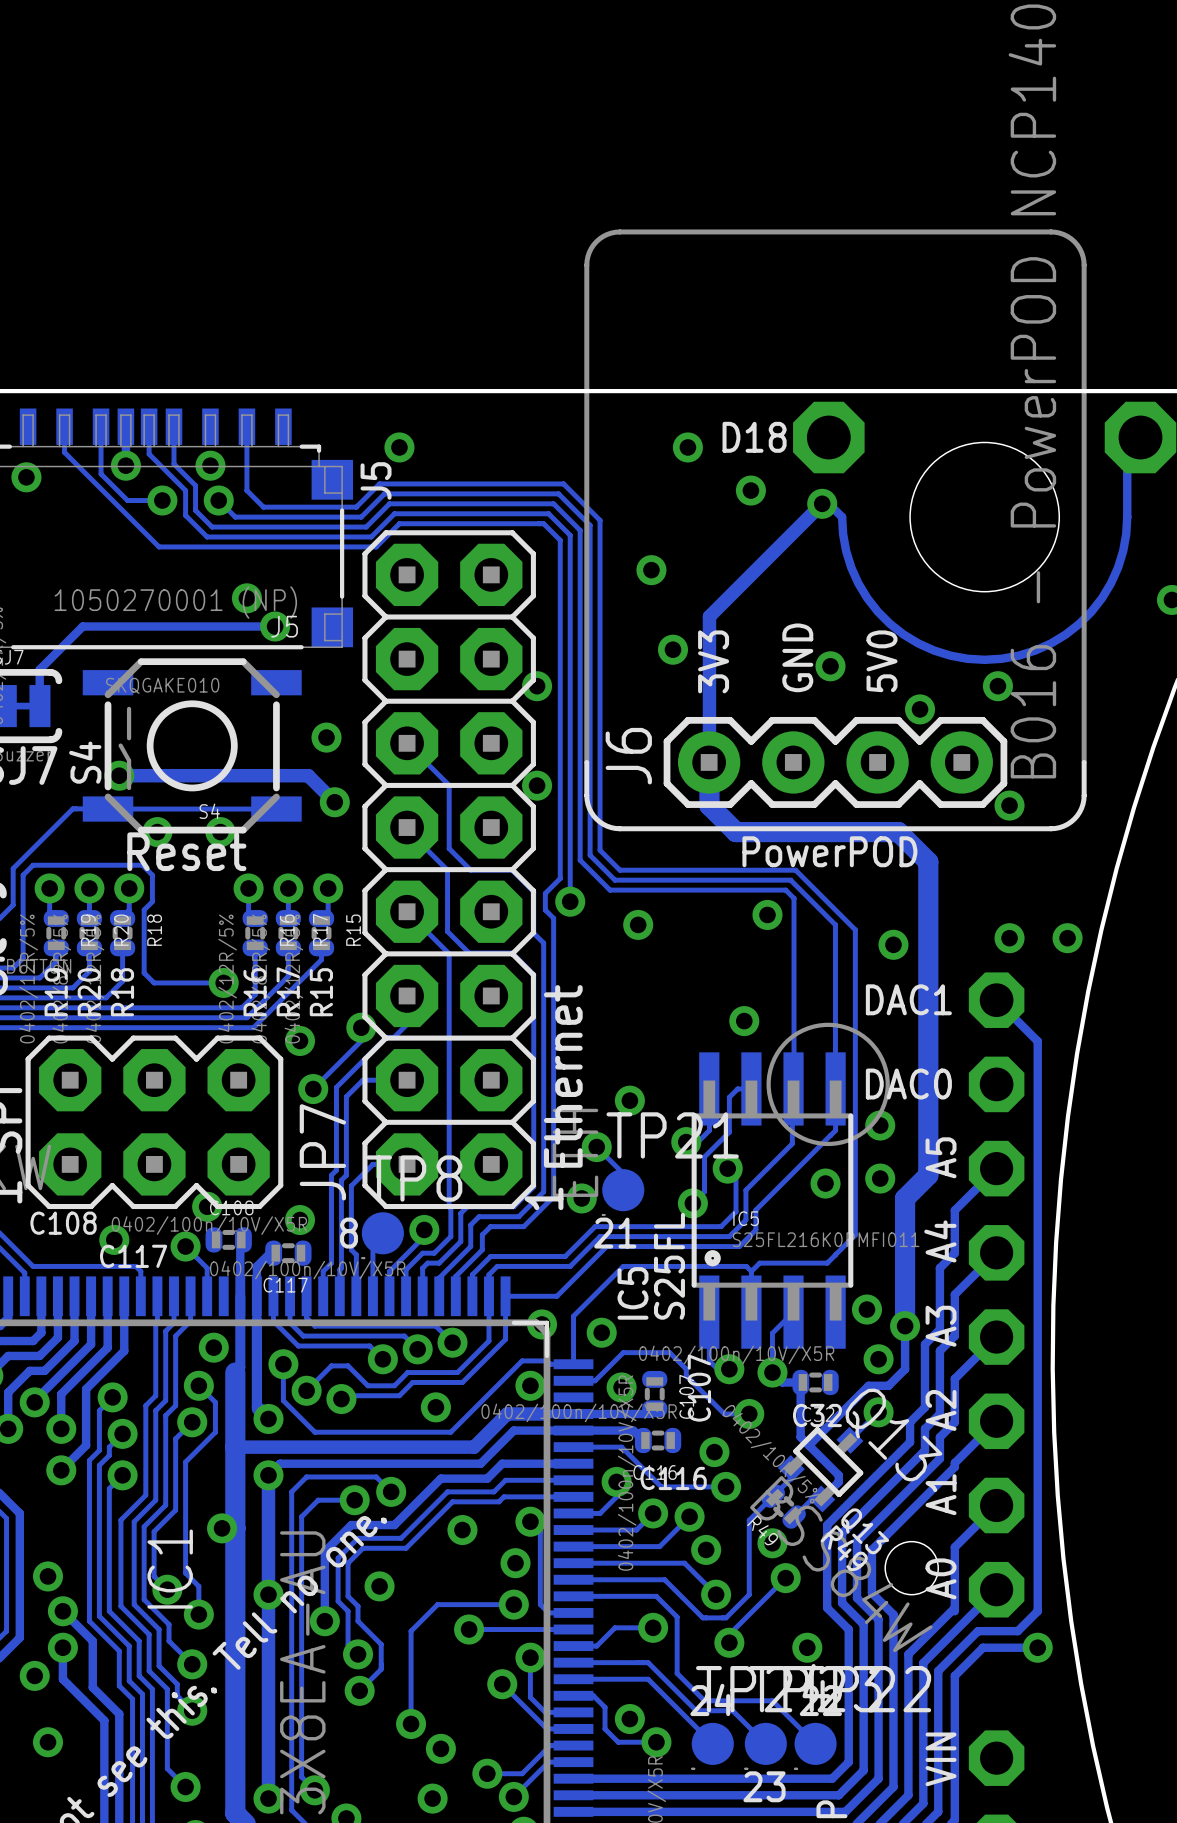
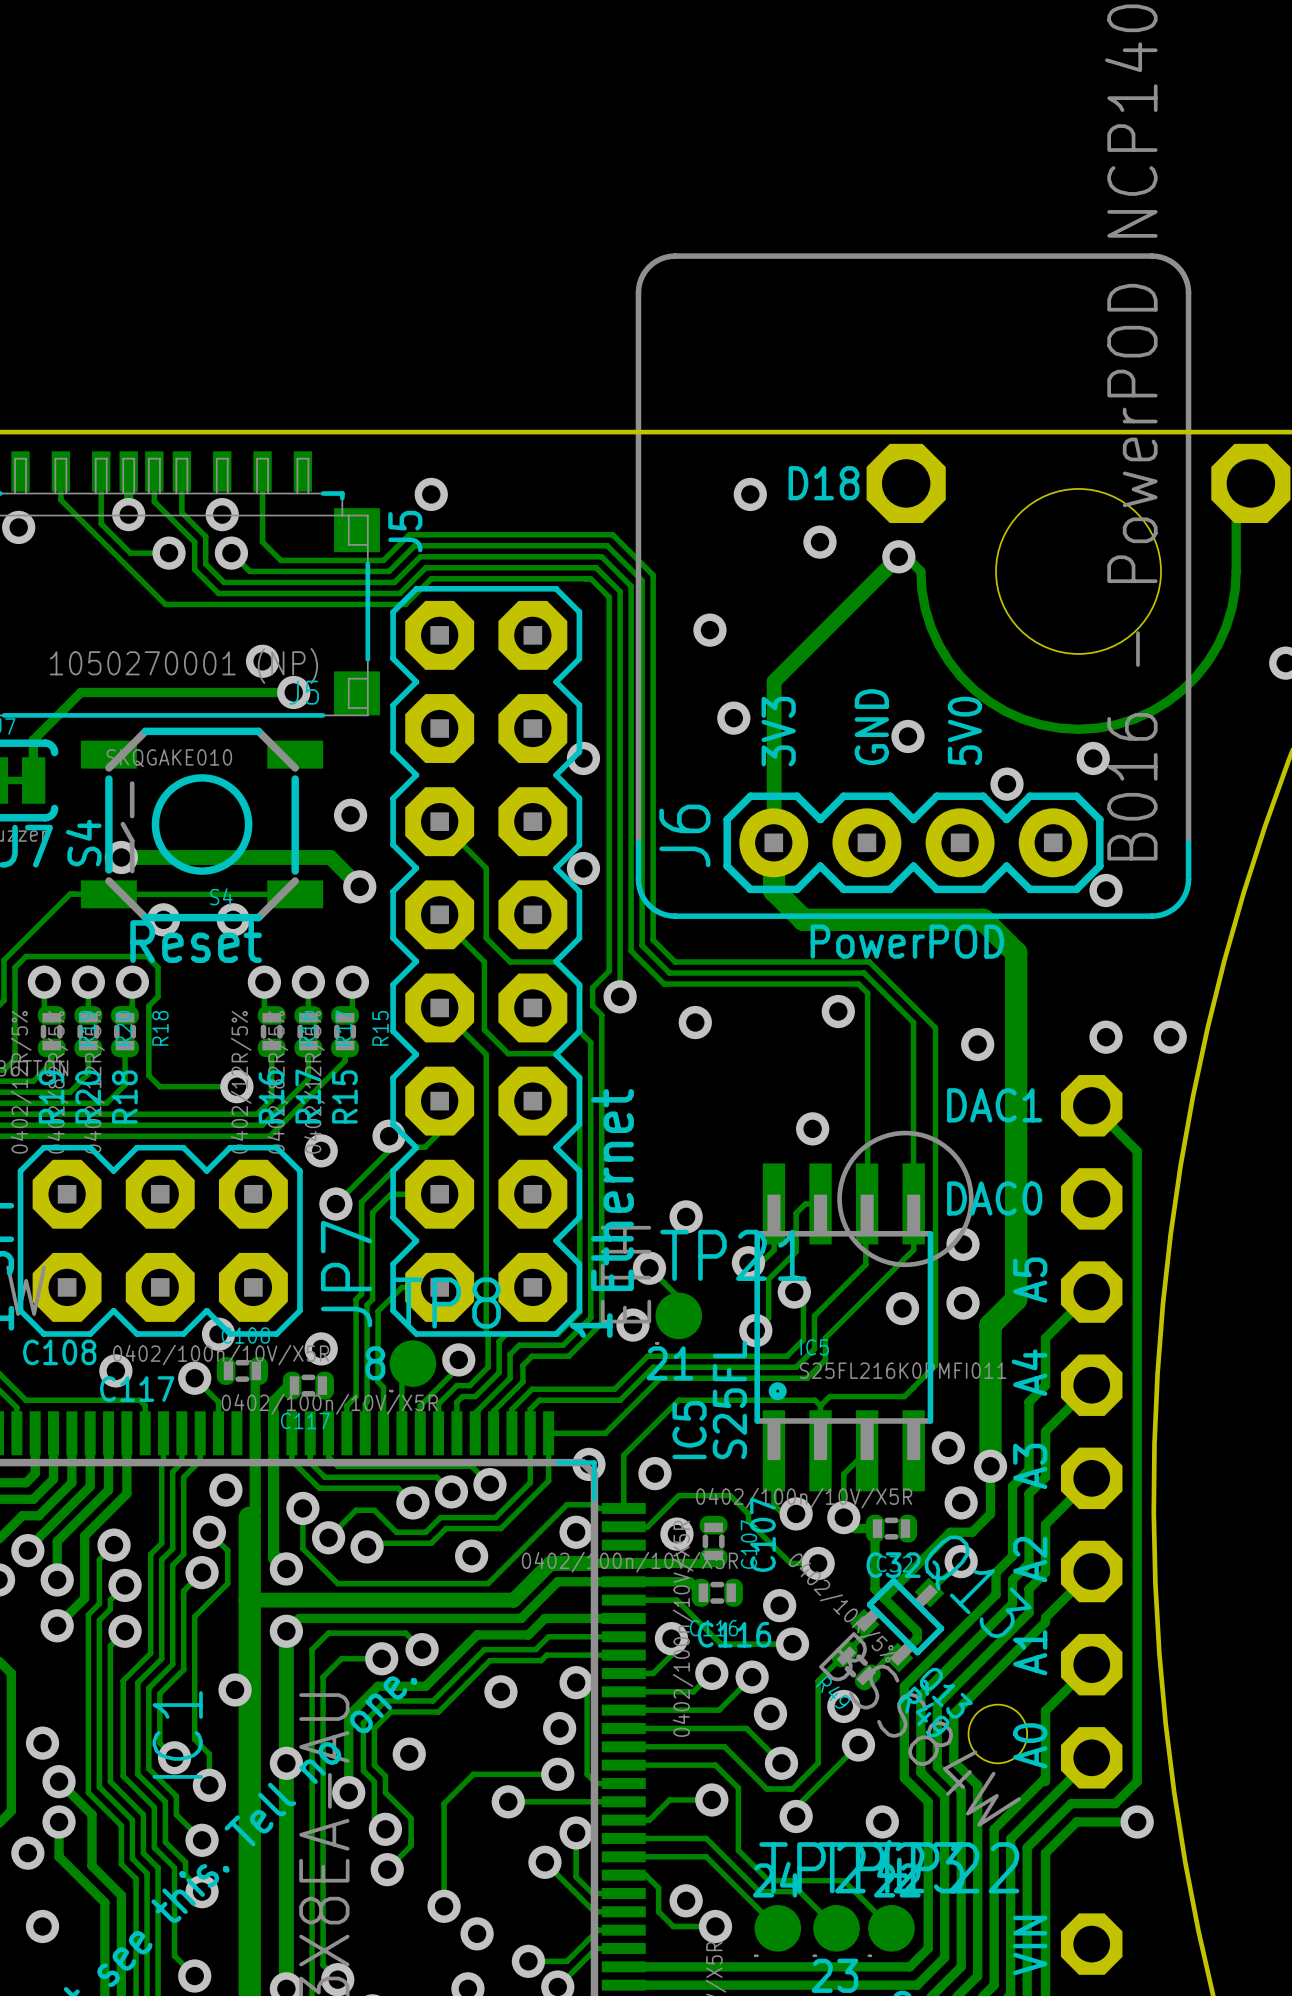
JP7 footprint: [362, 530, 536, 1210] -> [390, 586, 583, 1337]

